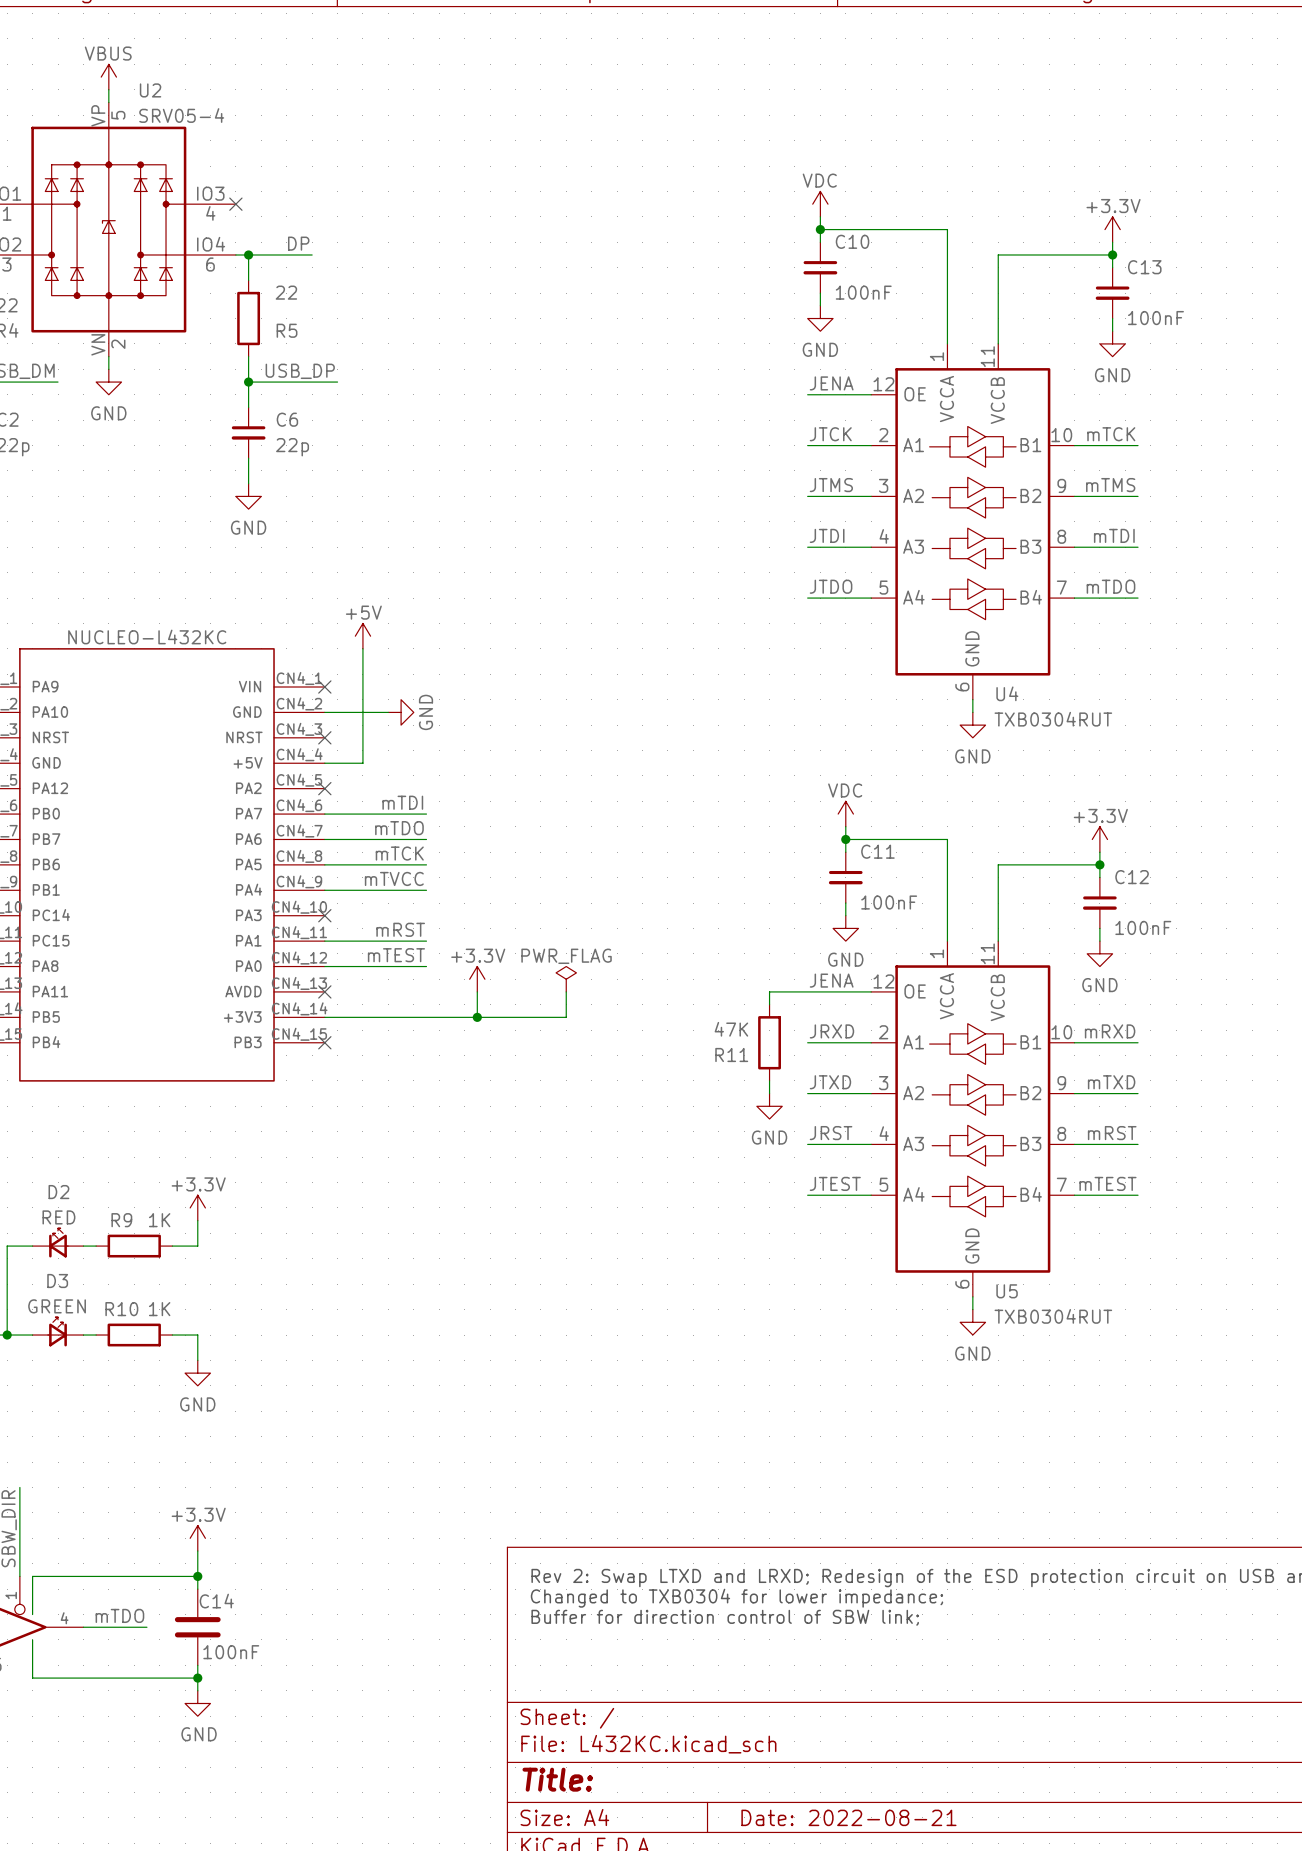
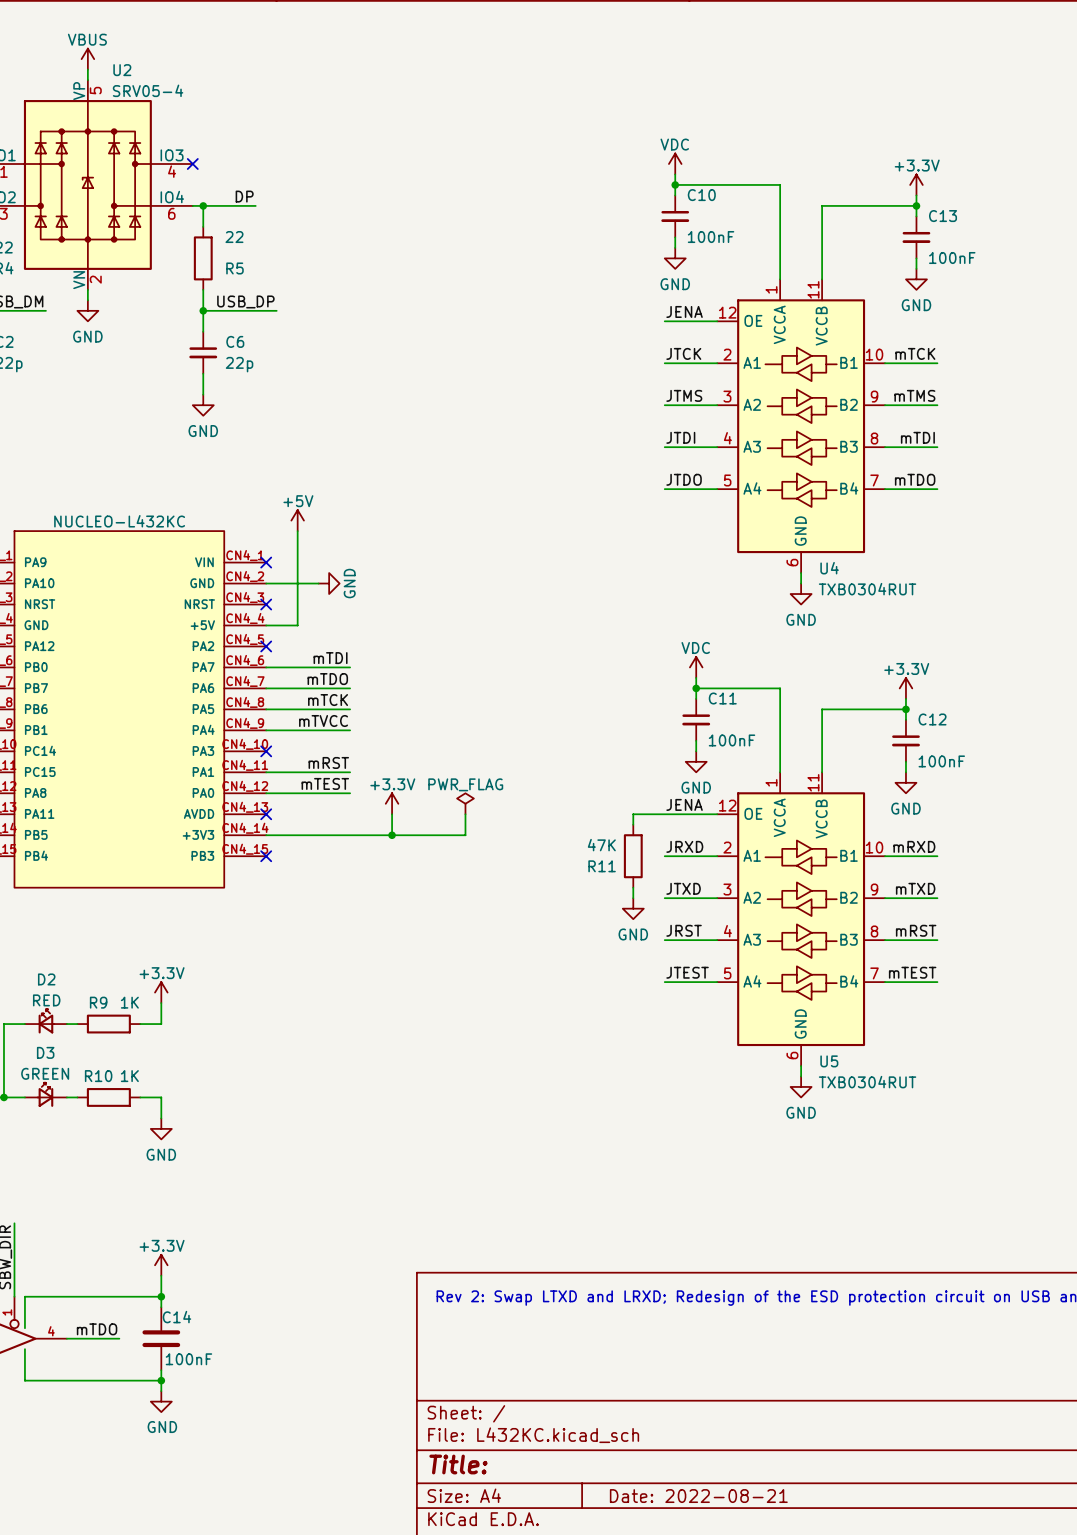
text: Changed to TXB0304 for lower impedance; (736, 1598) -> none
text: Buffer for direction control of SBW link; (725, 1617) -> none

